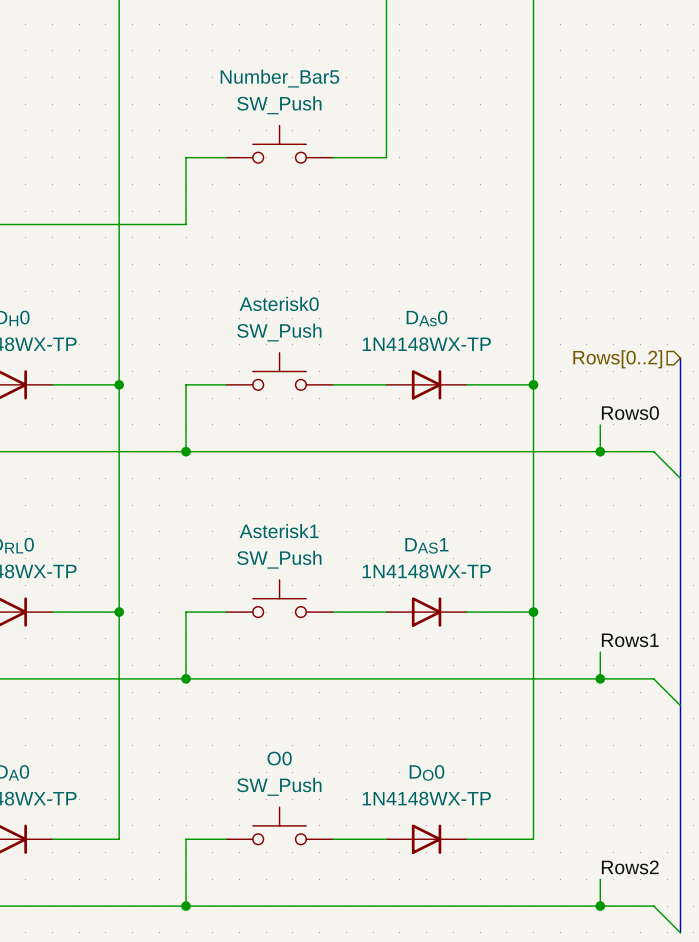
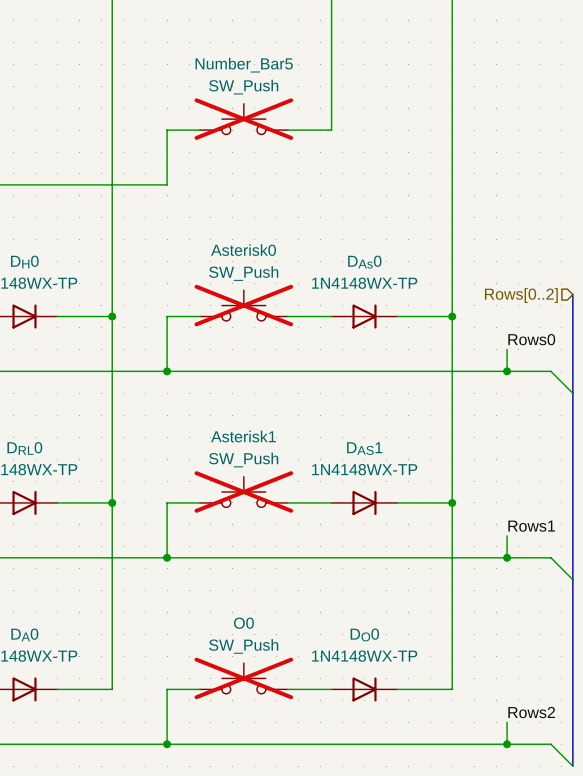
Number_Bar5 do-not-place cross: none -> (243, 119)
Asterisk0 do-not-place cross: none -> (243, 305)
Asterisk1 do-not-place cross: none -> (243, 491)
O0 do-not-place cross: none -> (243, 678)

